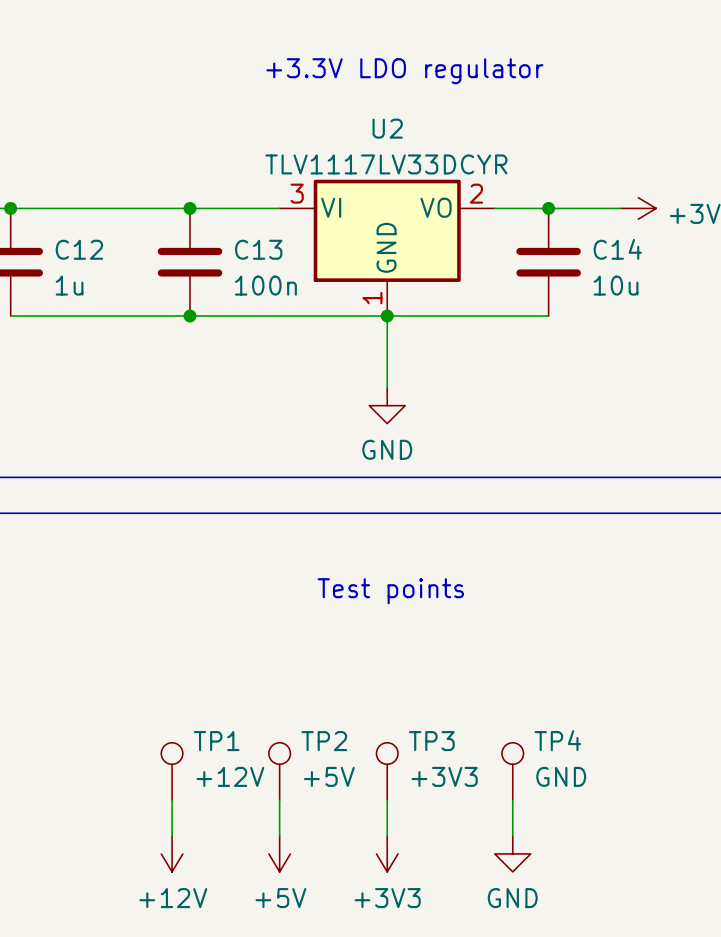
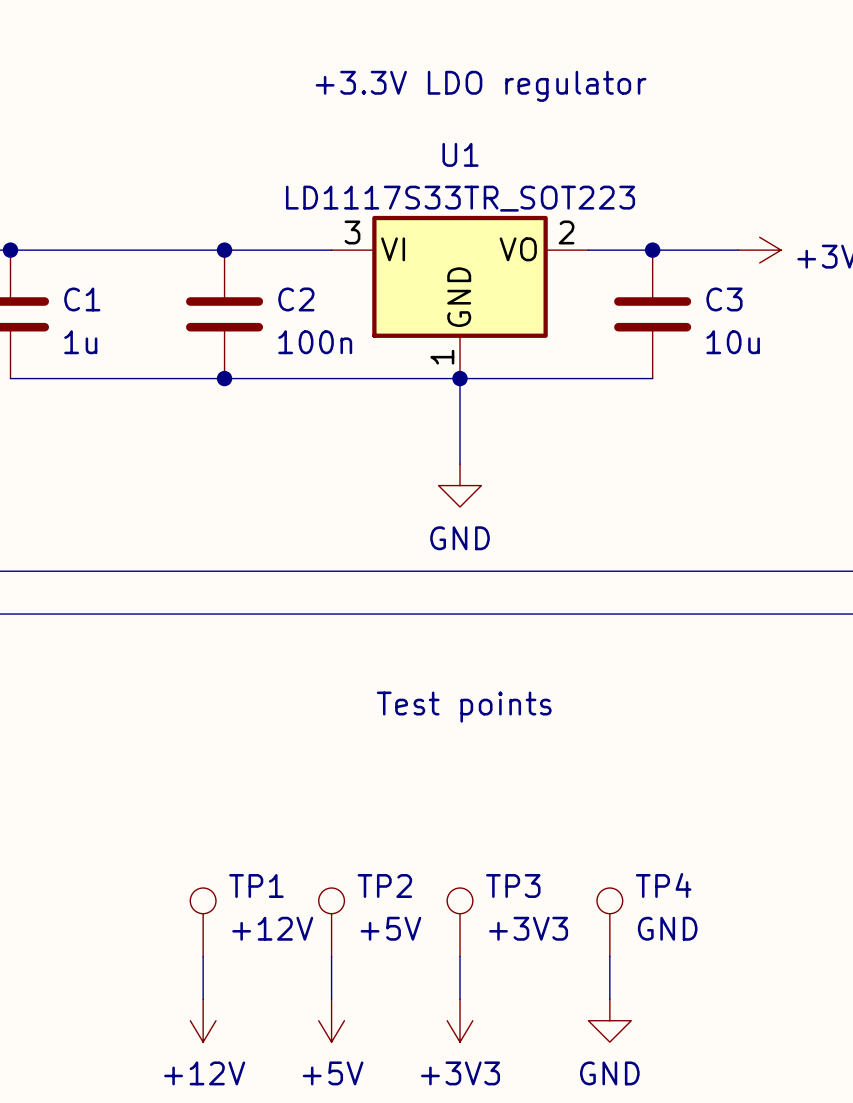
U2 name: U2 (387, 128) -> U1 (460, 154)
U2 value: TLV1117LV33DCYR (386, 164) -> LD1117S33TR_SOT223 (460, 198)
C12 name: C12 (79, 249) -> C1 (82, 299)
C13 name: C13 (258, 249) -> C2 (296, 299)
C14 name: C14 (617, 249) -> C3 (724, 299)

